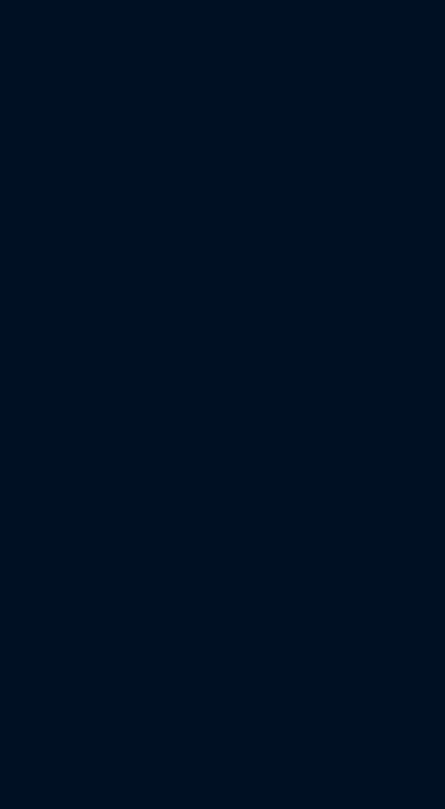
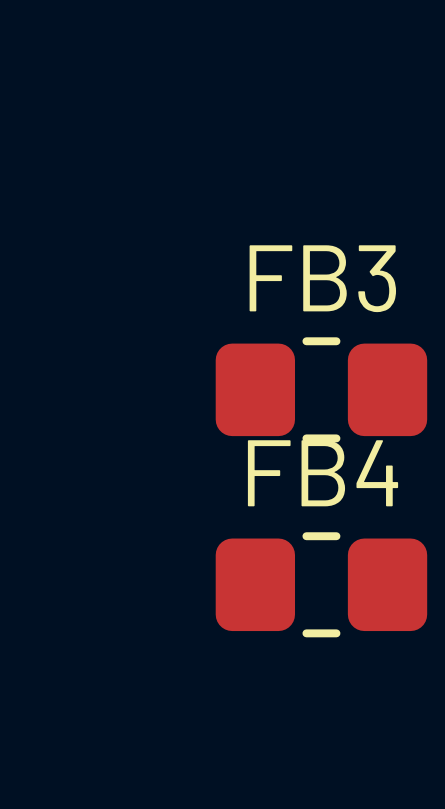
FB3: none -> (321, 389)
FB4: none -> (321, 584)

